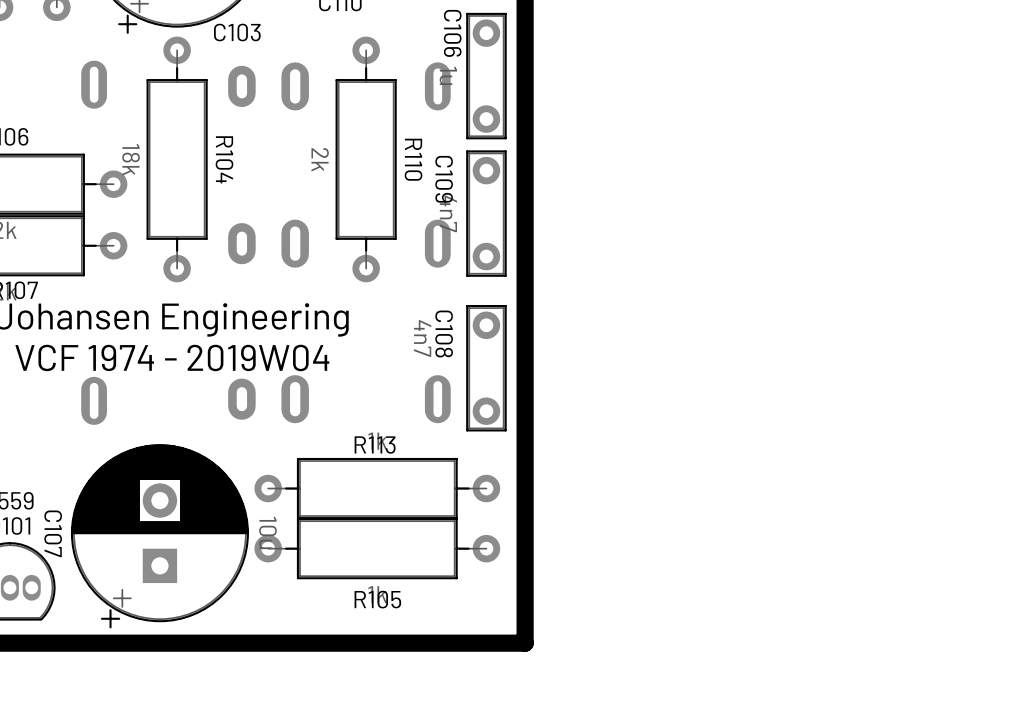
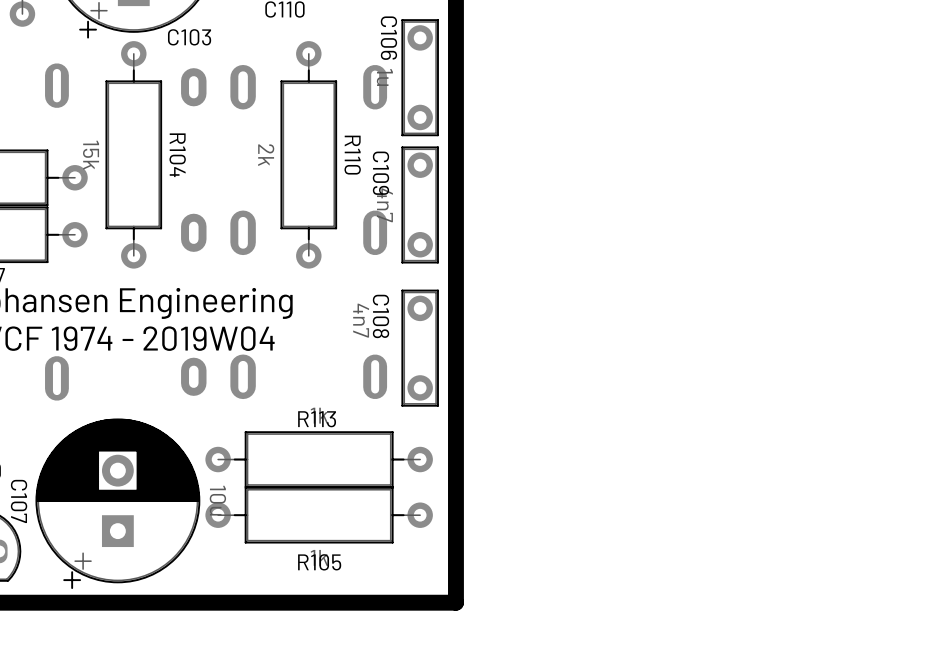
R104 value: 18k (131, 159) -> 15k (91, 155)

